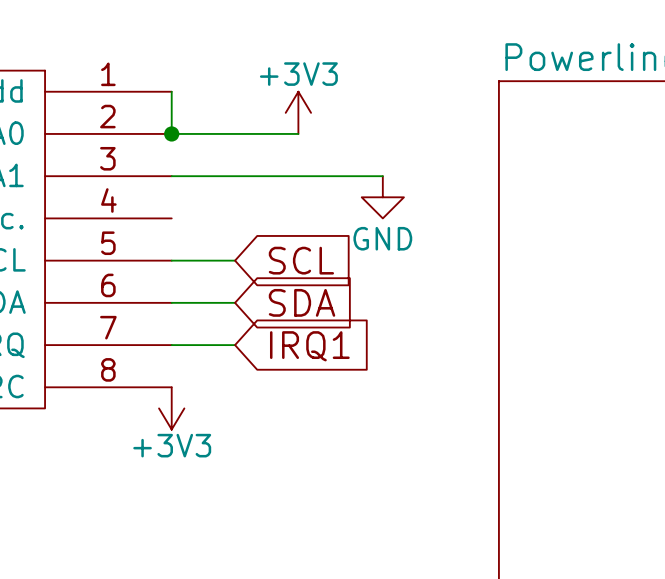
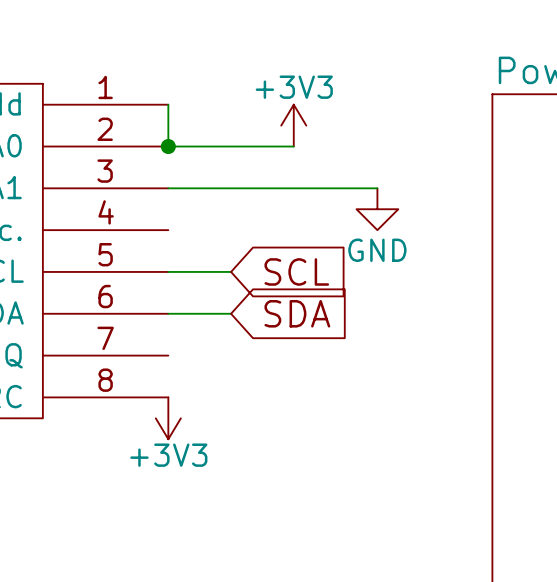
wire: (171, 345) (235, 345) -> none
global label: IRQ1 (309, 346) -> none

